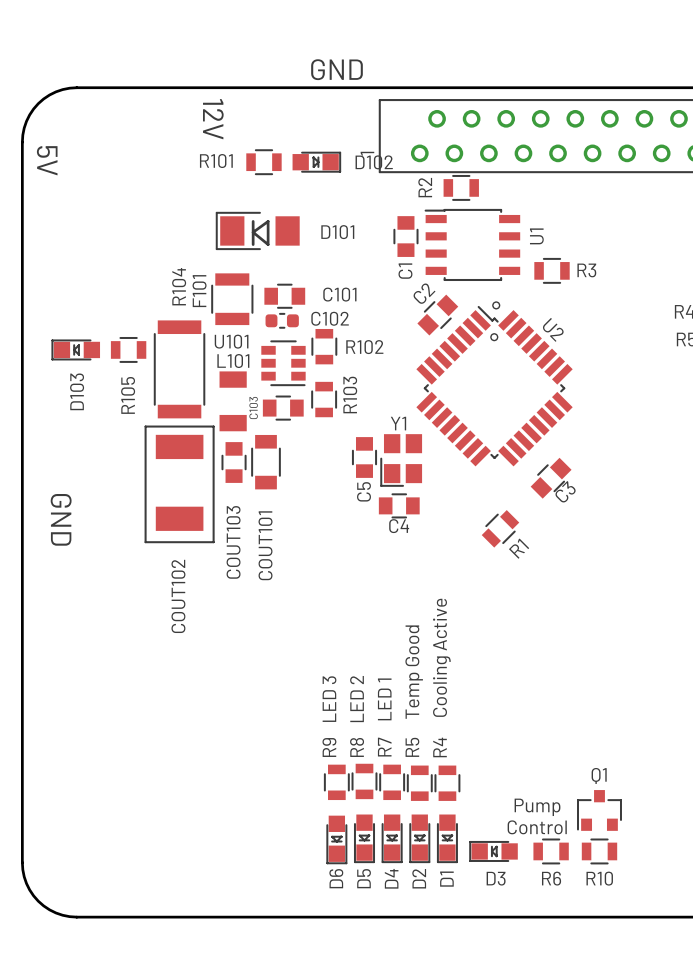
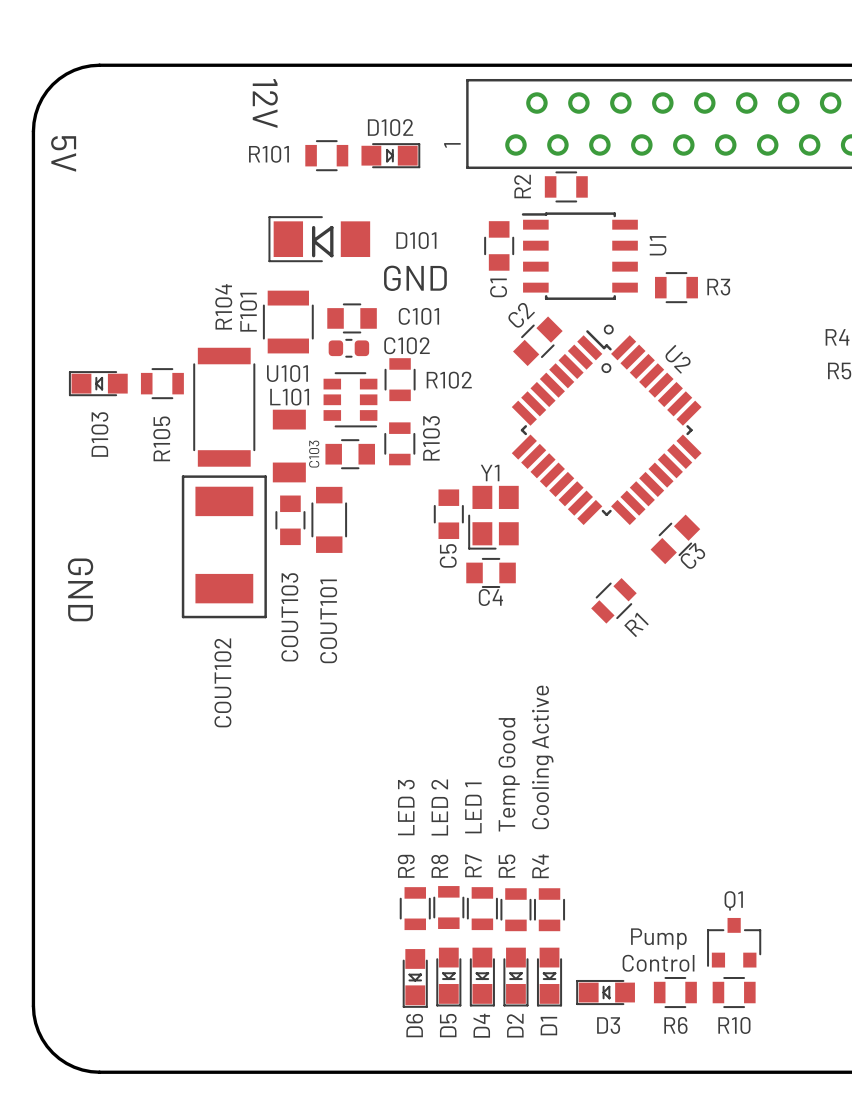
text position: GND (336, 69) -> GND (415, 278)
D102 name position: D102 (374, 162) -> D102 (390, 127)

